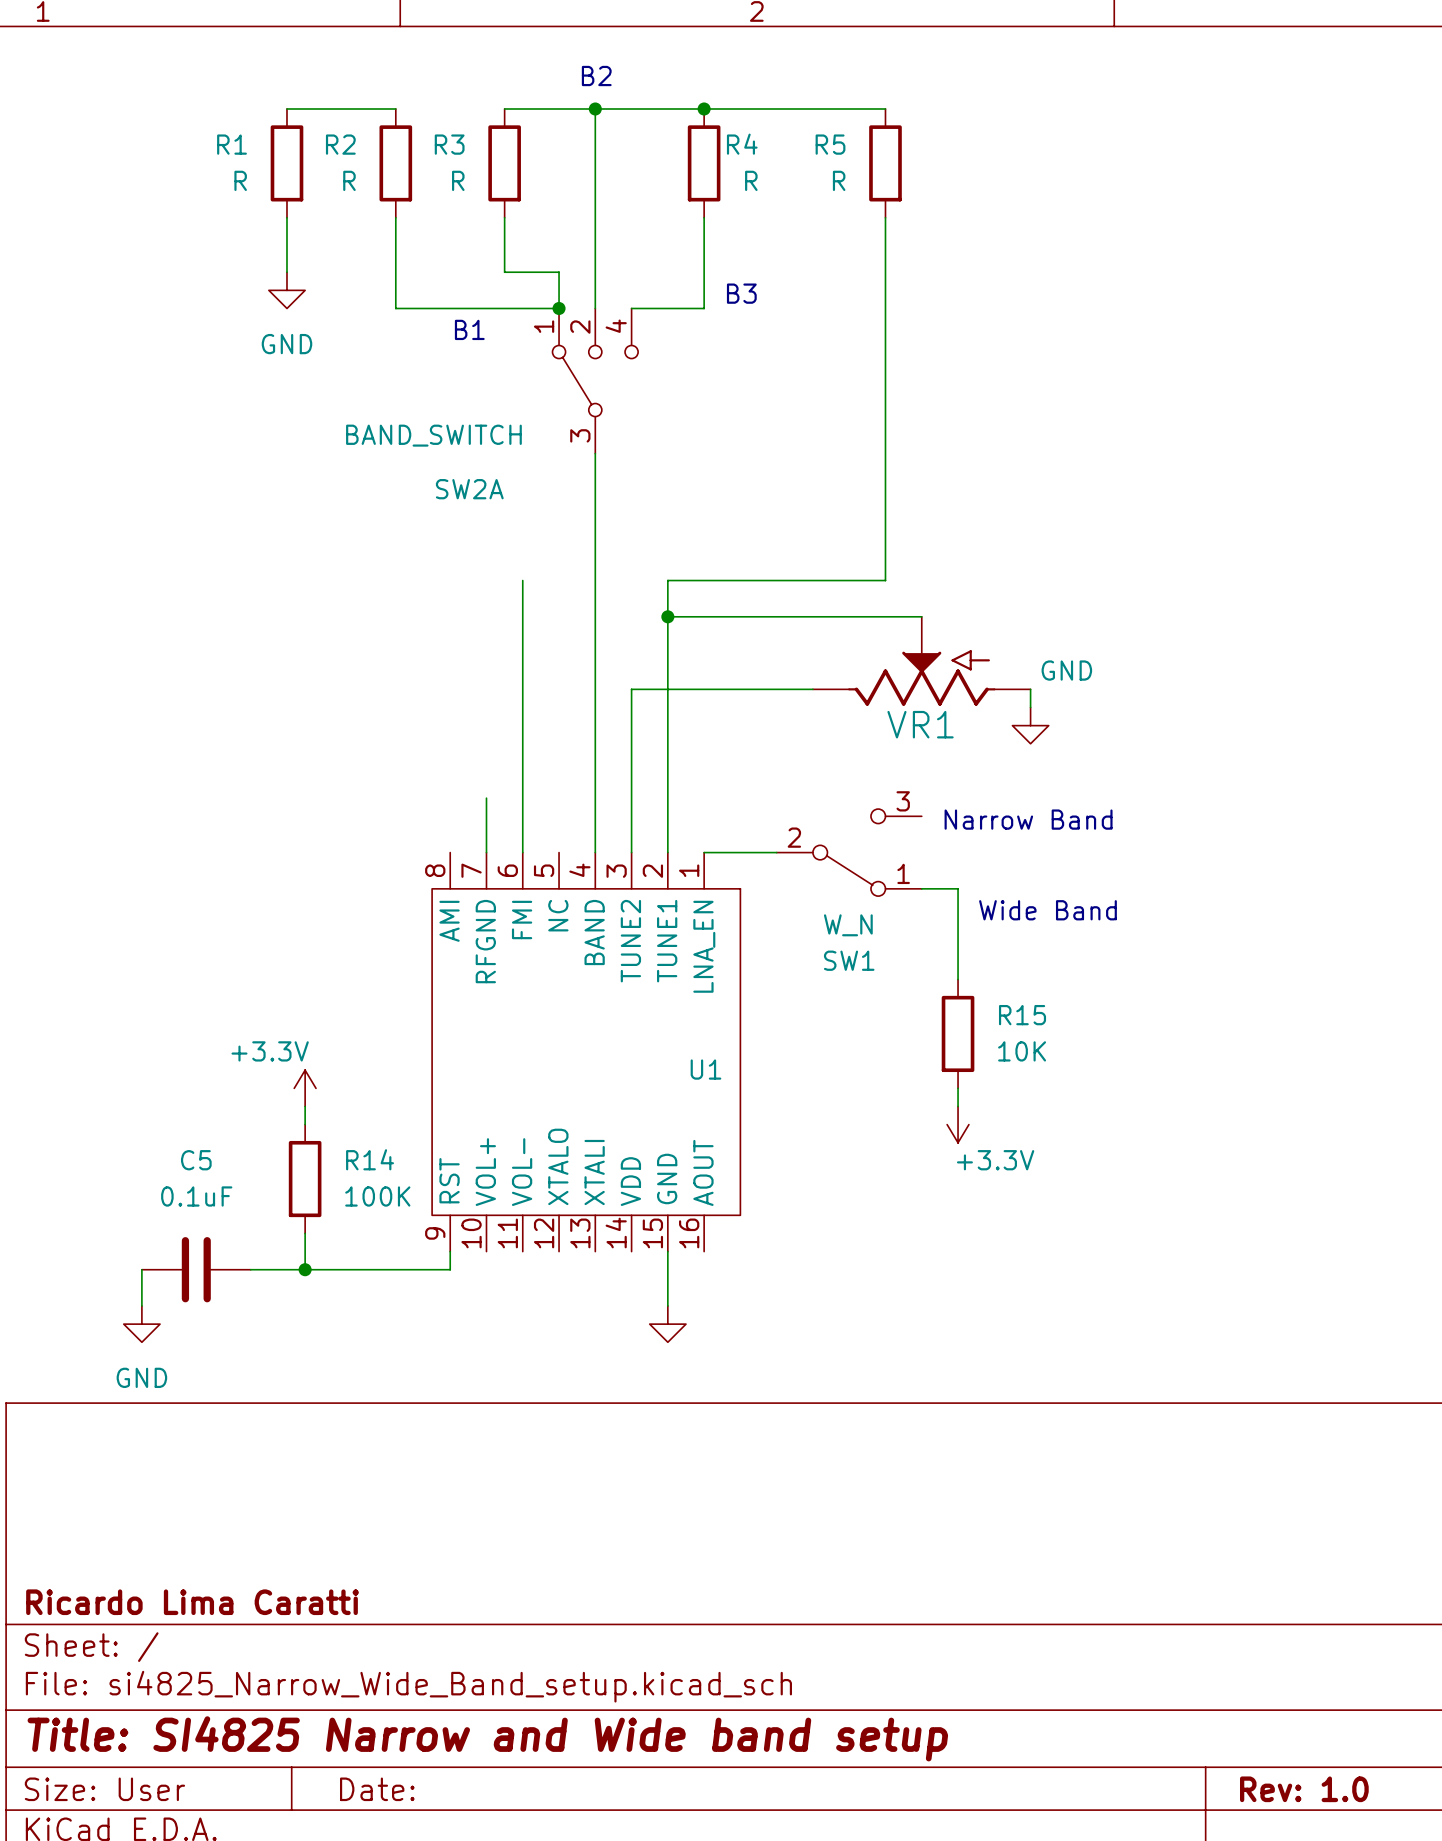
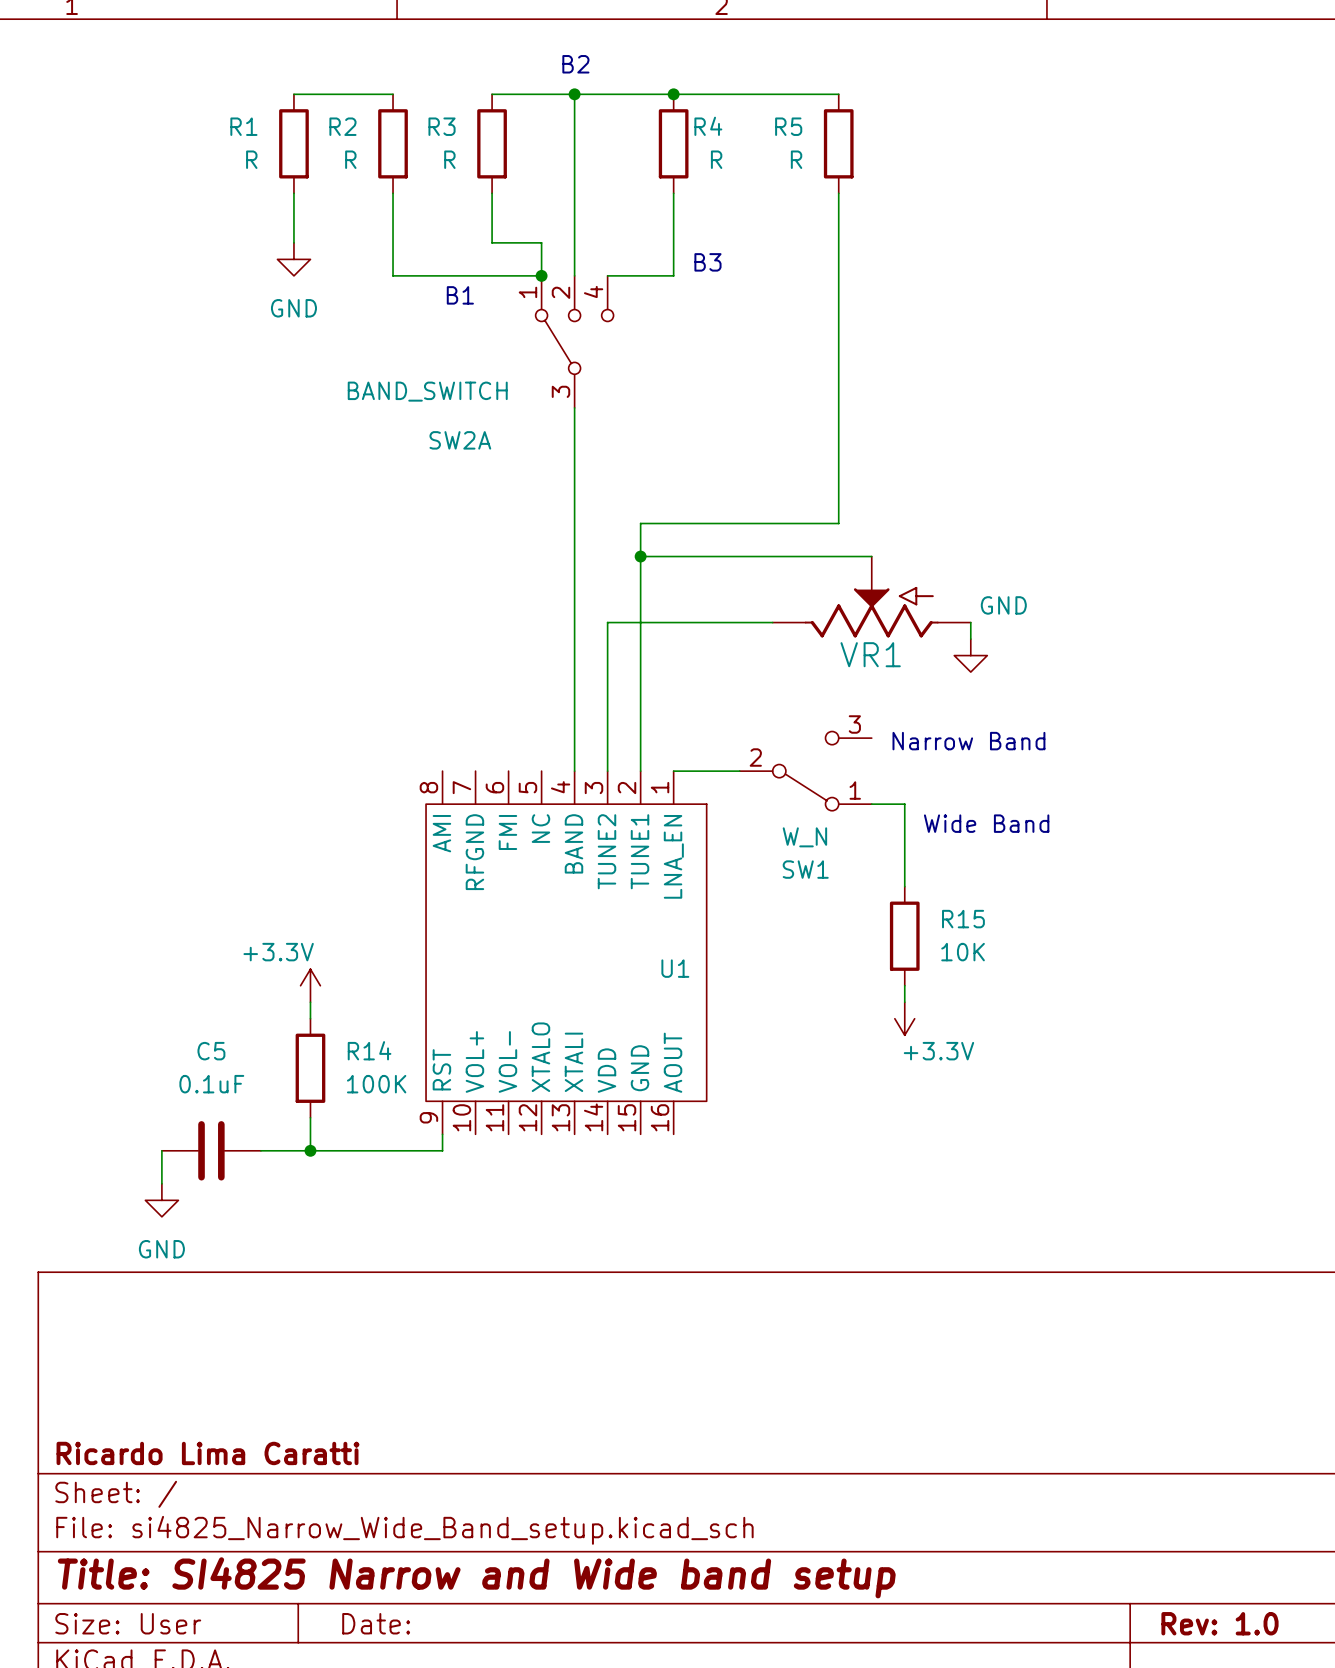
wire: (522, 580) (522, 852) -> none
wire: (486, 798) (486, 852) -> none
wire: (667, 1251) (667, 1305) -> none
power symbol: (667, 1324) -> none

